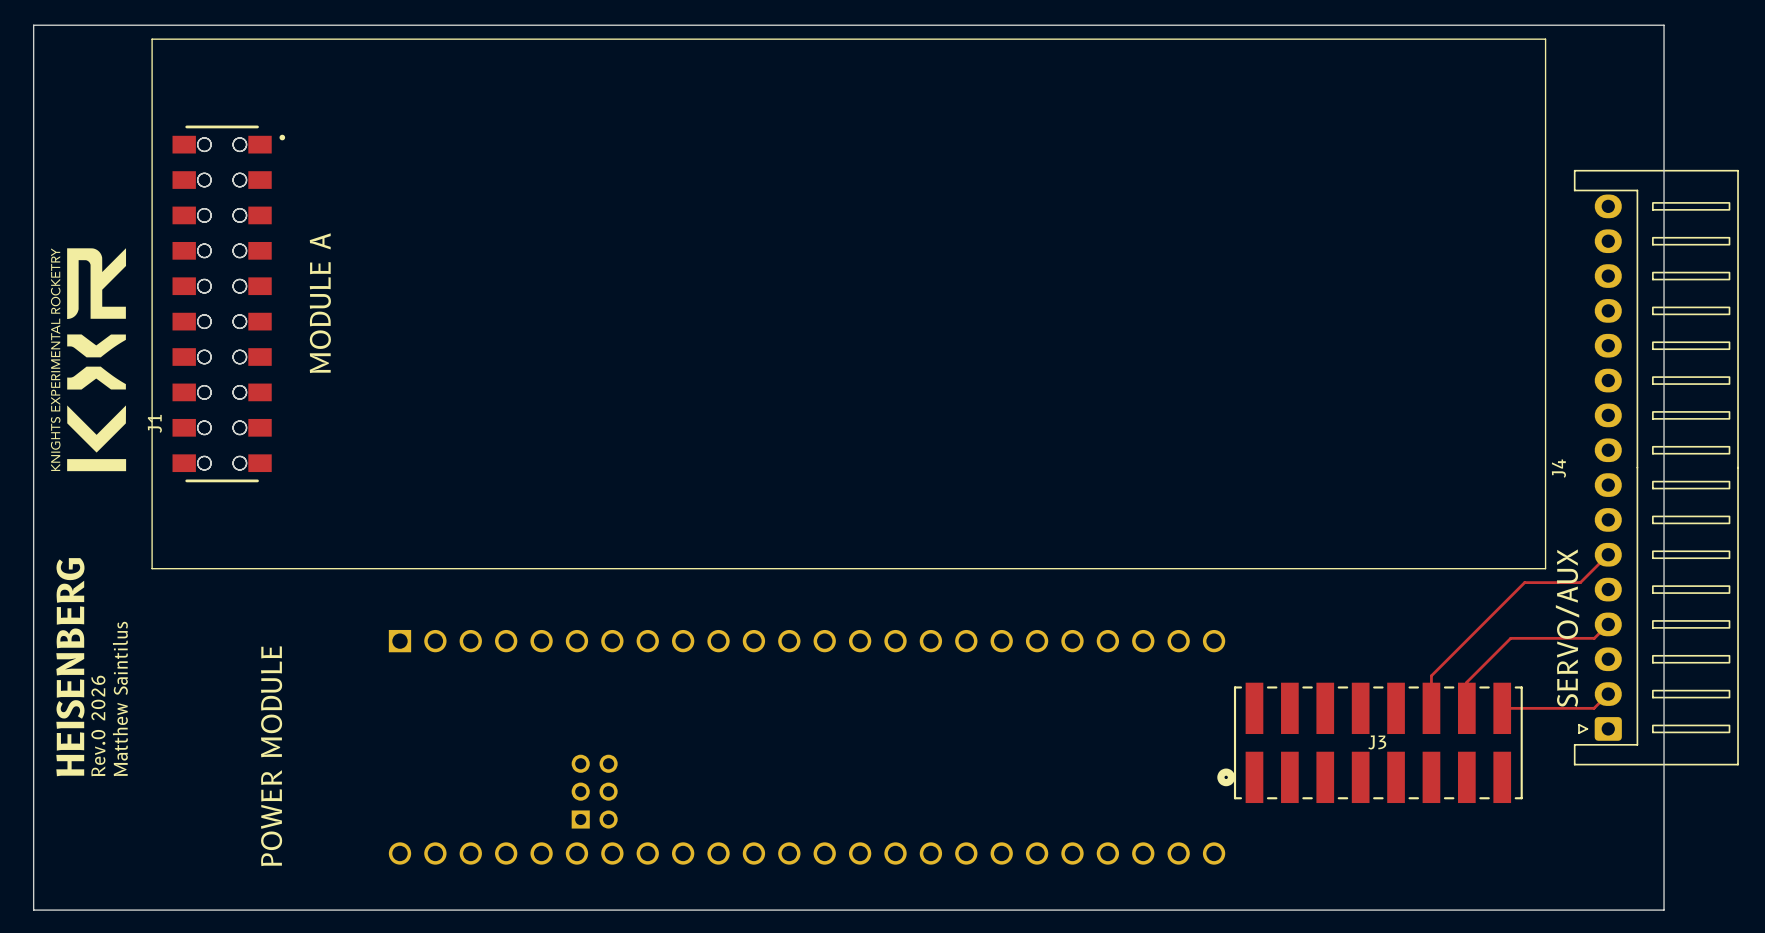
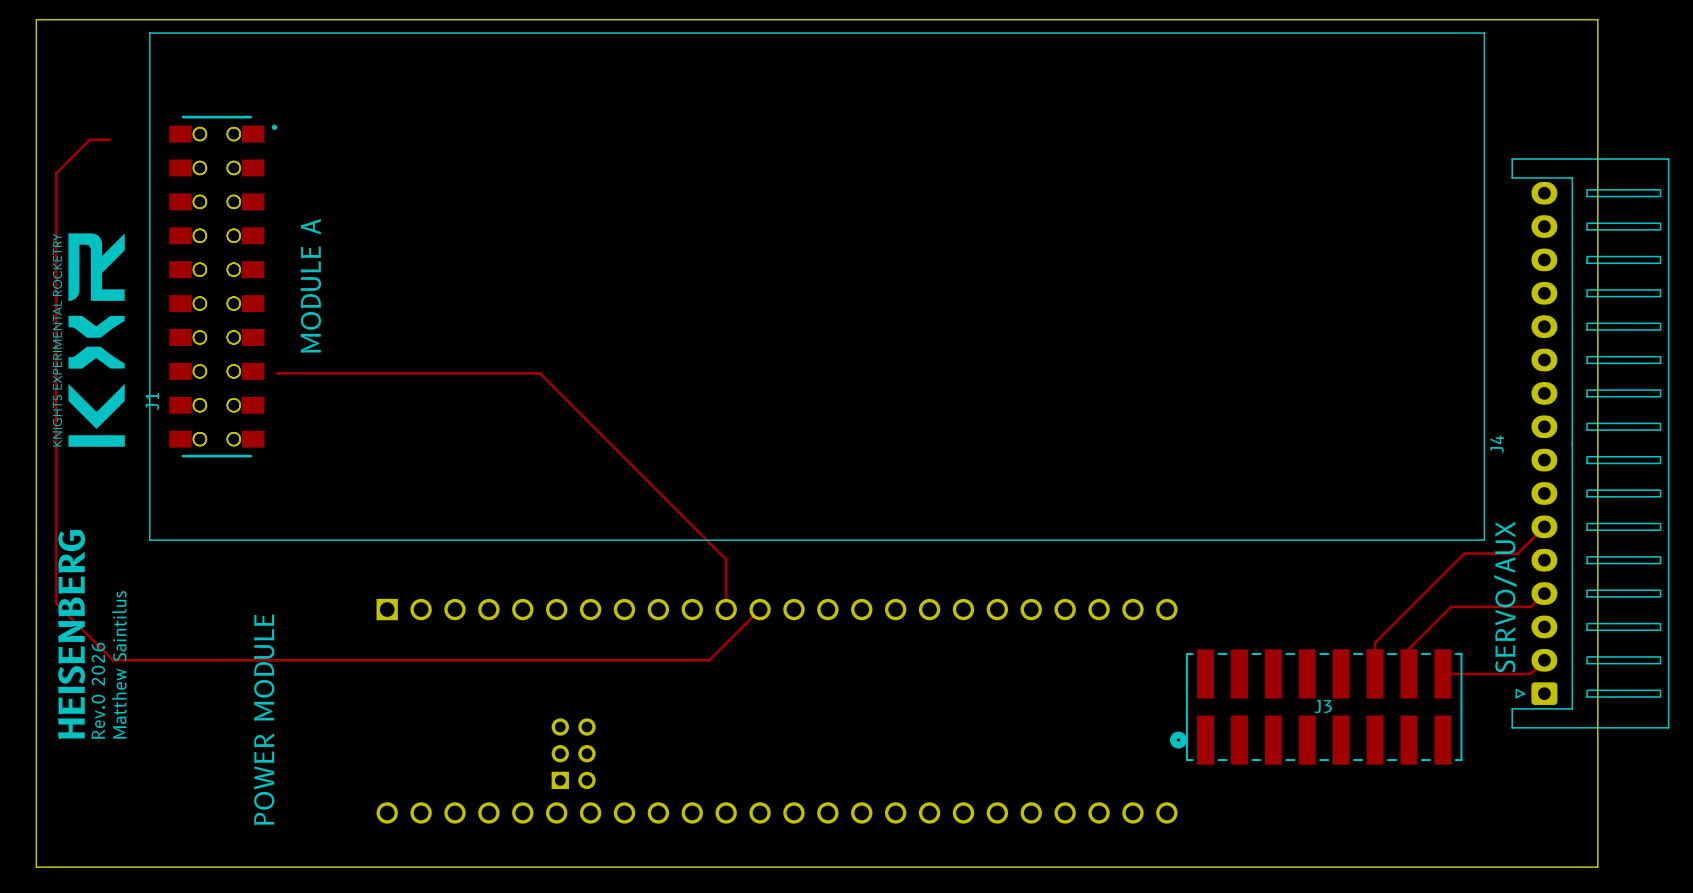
track: none -> (109, 139) (89, 139) (56, 173) (56, 603) (113, 660) (709, 660) (760, 609)
track: none -> (276, 373) (540, 373) (726, 559) (726, 609)

